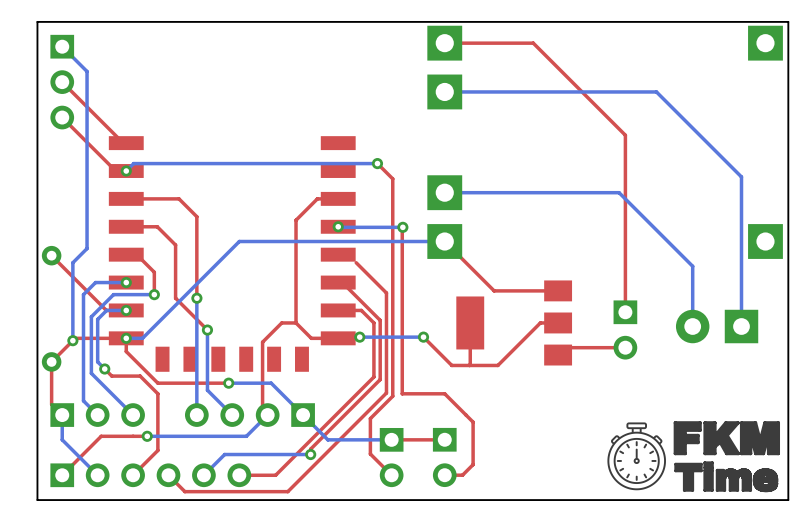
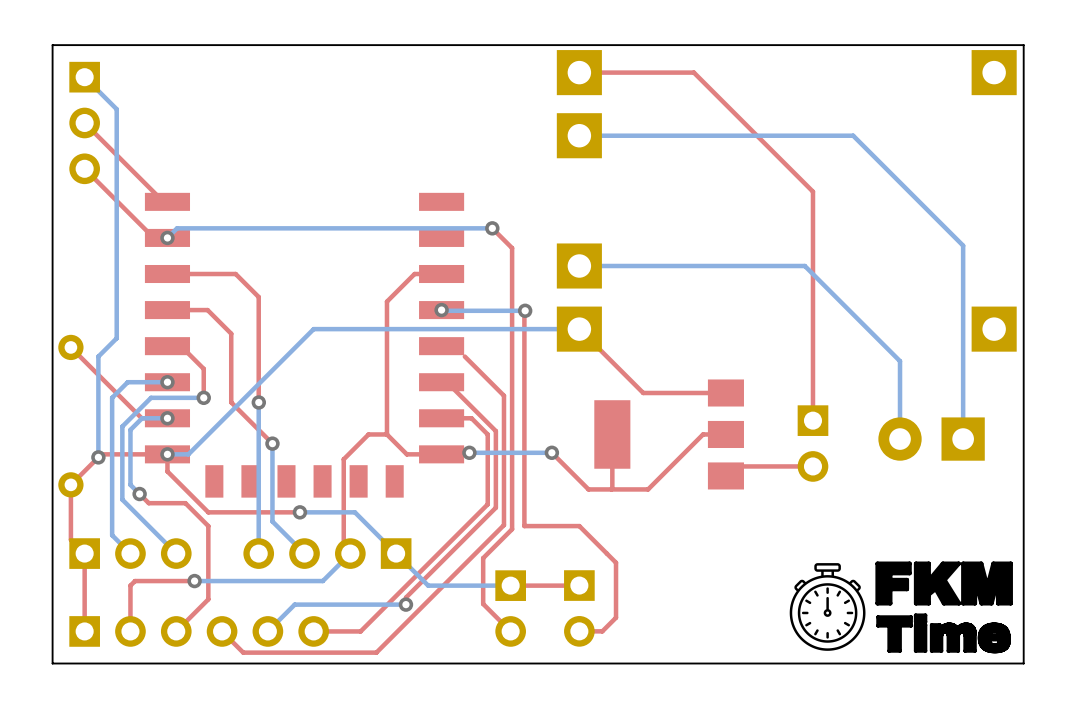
top track: none -> (84, 553) (84, 631)
bottom track: (62, 415) (62, 439) (97, 475) -> none
top track: (97, 439) (62, 475) -> (130, 585) (130, 631)

